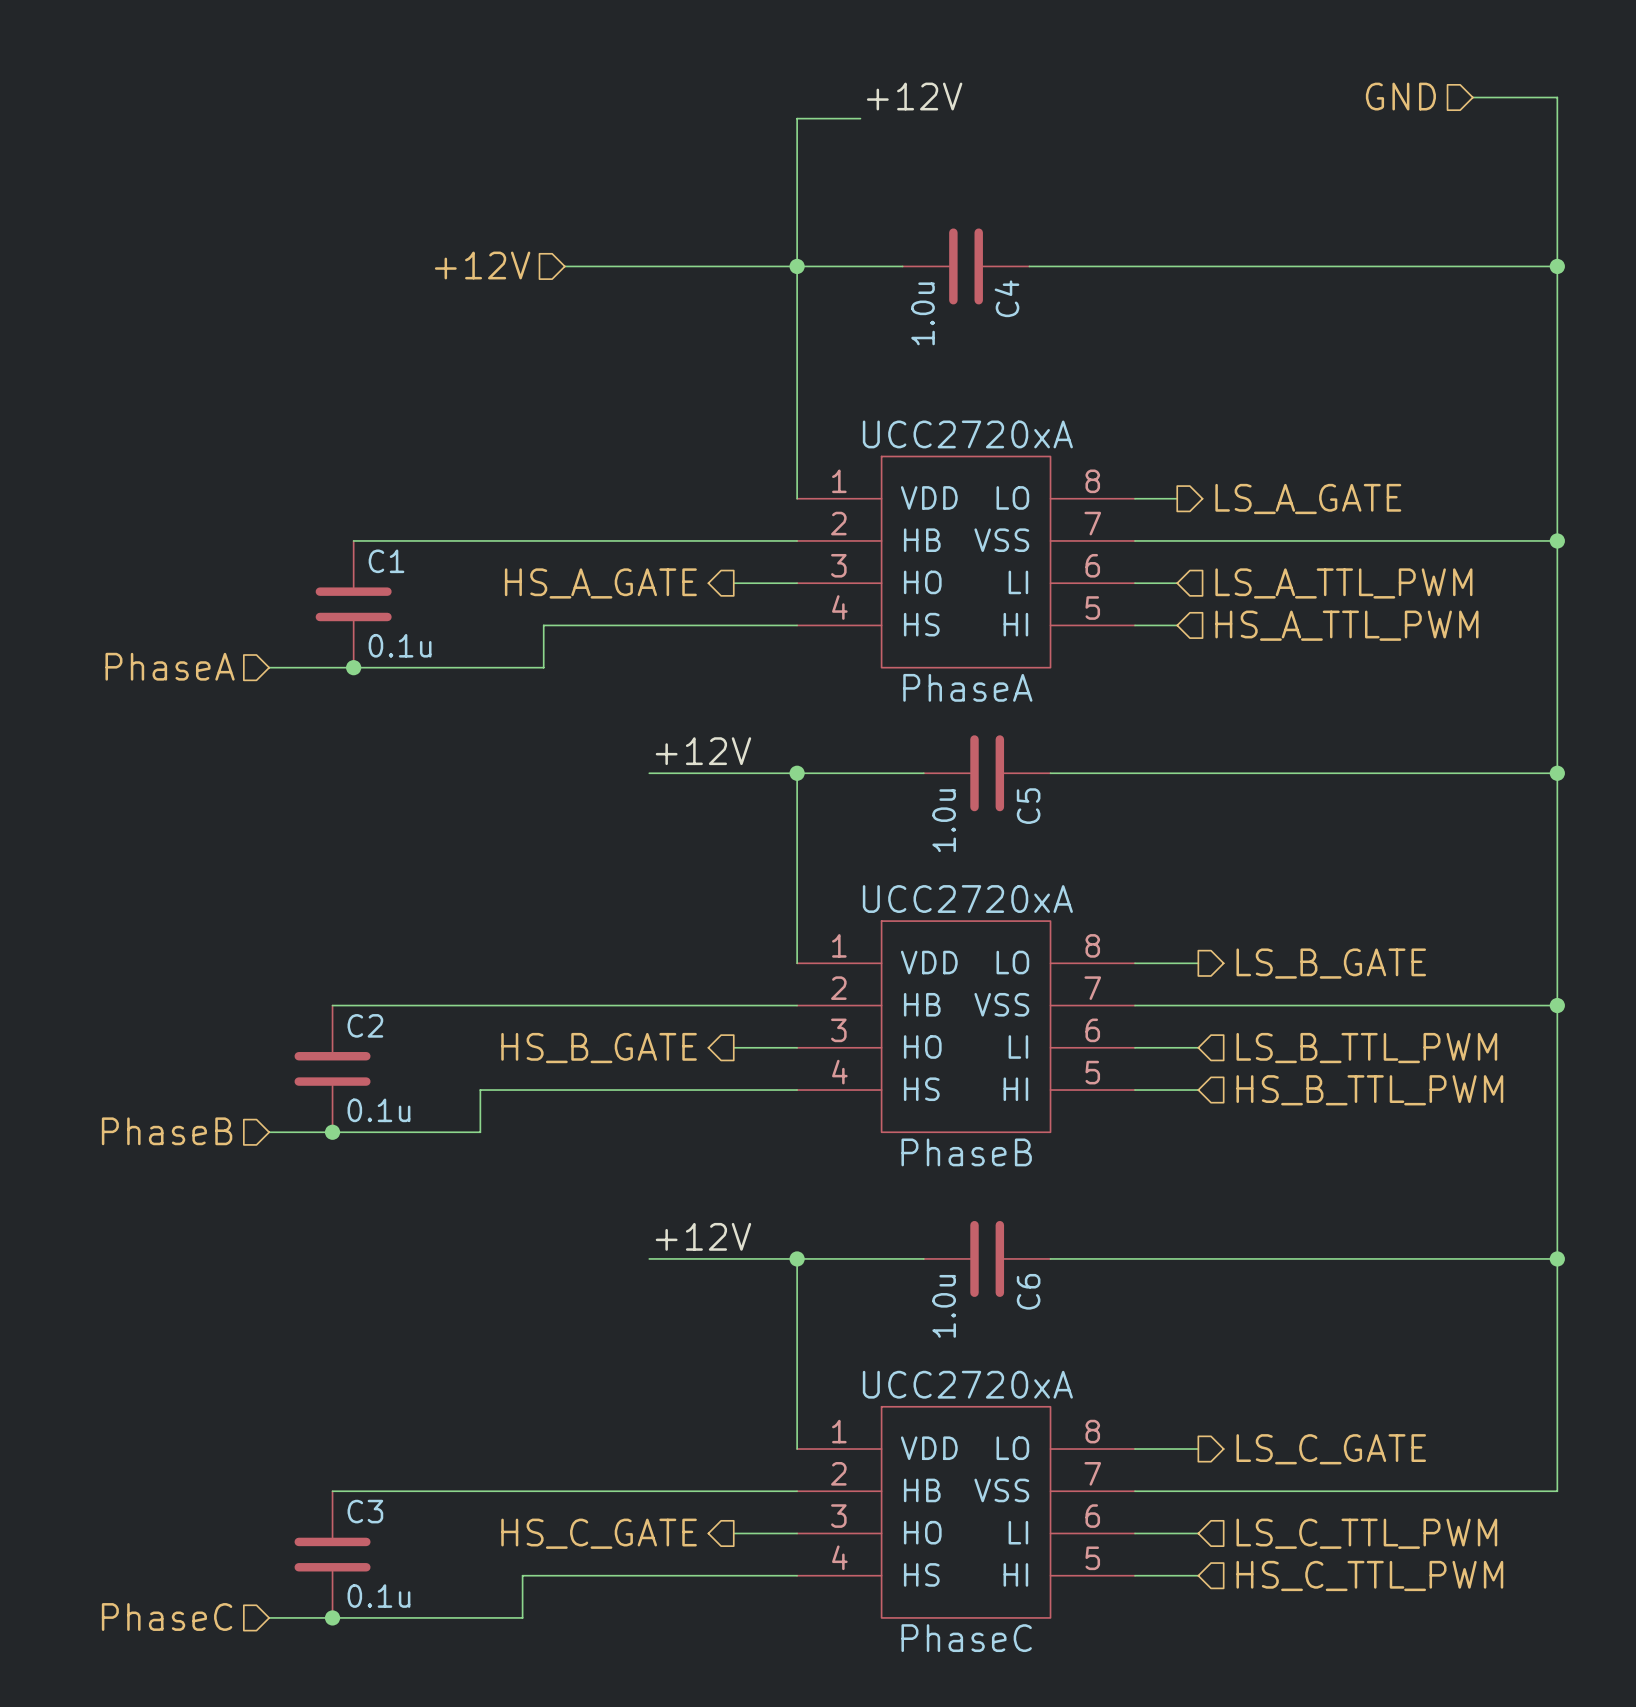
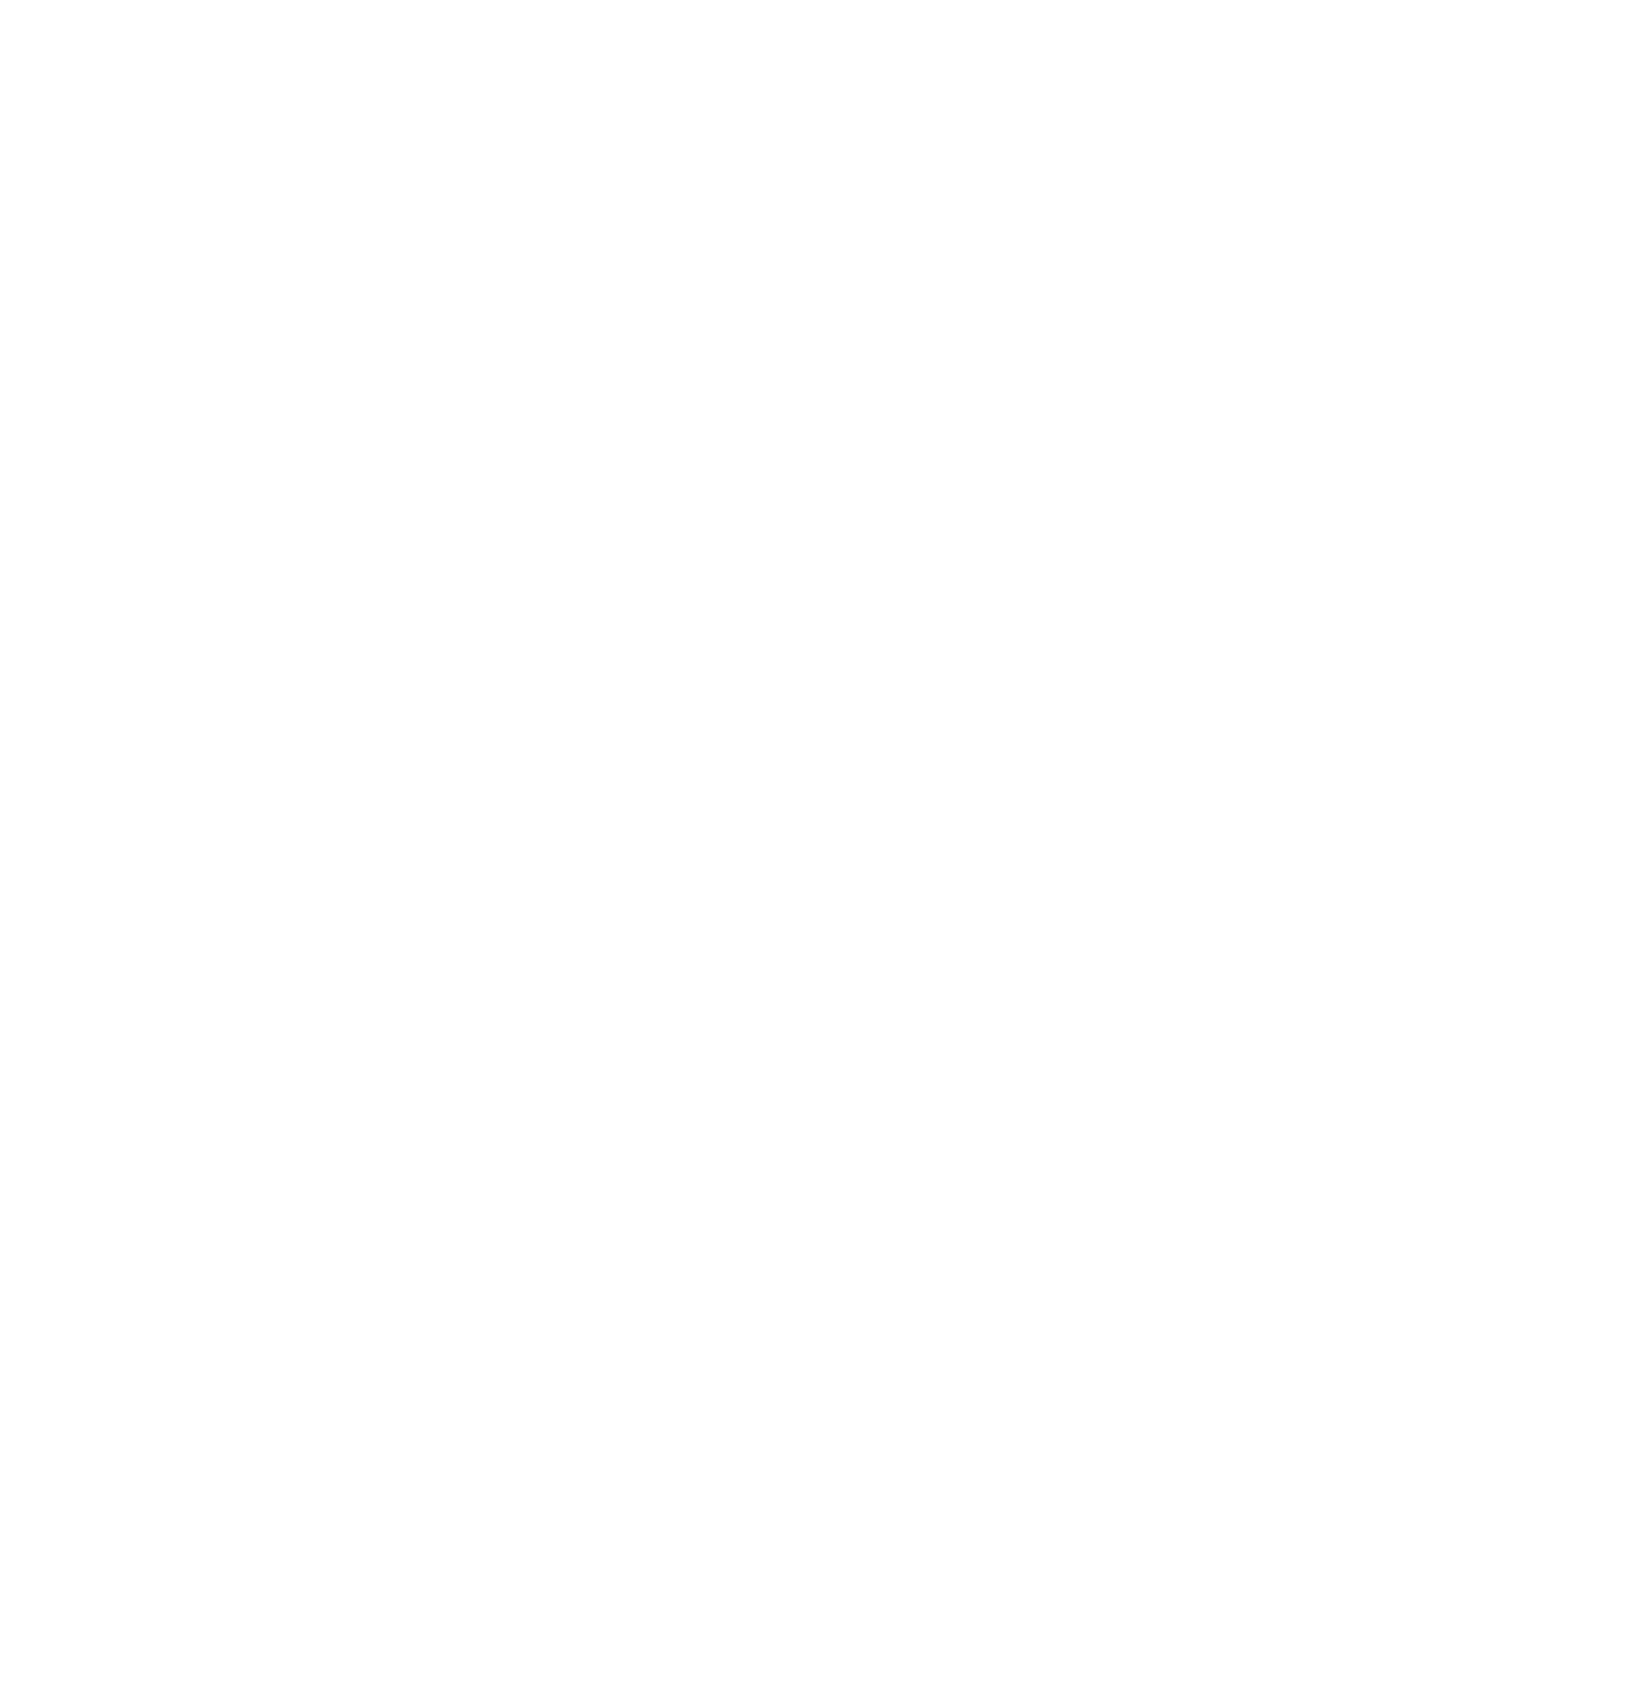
label: +12V (914, 96) -> none
hierarchical label: GND (1400, 96) -> none
wire: (1472, 97) (1557, 97) (1557, 1491) (1134, 1491) -> none
wire: (860, 118) (797, 118) (797, 498) -> none
hierarchical label: +12V (482, 265) -> none
wire: (564, 266) (902, 266) -> none
junction: (797, 266) -> none
C4: 1.0u (966, 266) -> none
wire: (1029, 266) (1557, 266) -> none
junction: (1557, 266) -> none
wire: (1134, 498) (1177, 498) -> none
hierarchical label: LS_A_GATE (1308, 498) -> none
wire: (353, 540) (797, 540) -> none
wire: (1134, 540) (1557, 540) -> none
junction: (1557, 540) -> none
PhaseA: UCC2720xA (966, 562) -> none
hierarchical label: HS_A_GATE (600, 583) -> none
wire: (733, 583) (797, 583) -> none
wire: (1134, 583) (1177, 583) -> none
hierarchical label: LS_A_TTL_PWM (1343, 583) -> none
C1: 0.1u (353, 604) -> none
wire: (797, 625) (543, 625) (543, 667) (269, 667) -> none
wire: (1134, 625) (1177, 625) -> none
hierarchical label: HS_A_TTL_PWM (1346, 625) -> none
hierarchical label: PhaseA (170, 666) -> none
junction: (353, 667) -> none
label: +12V (703, 751) -> none
wire: (649, 773) (923, 773) -> none
wire: (797, 773) (797, 963) -> none
junction: (797, 773) -> none
C5: 1.0u (987, 773) -> none
wire: (1050, 773) (1557, 773) -> none
junction: (1557, 773) -> none
wire: (1134, 963) (1198, 963) -> none
hierarchical label: LS_B_GATE (1331, 963) -> none
wire: (332, 1005) (797, 1005) -> none
wire: (1134, 1005) (1557, 1005) -> none
junction: (1557, 1005) -> none
PhaseB: UCC2720xA (966, 1026) -> none
wire: (733, 1047) (797, 1047) -> none
wire: (1134, 1047) (1198, 1047) -> none
hierarchical label: HS_B_GATE (599, 1048) -> none
hierarchical label: LS_B_TTL_PWM (1366, 1048) -> none
C2: 0.1u (332, 1068) -> none
wire: (797, 1090) (480, 1090) (480, 1132) (269, 1132) -> none
wire: (1134, 1090) (1198, 1090) -> none
hierarchical label: HS_B_TTL_PWM (1369, 1090) -> none
hierarchical label: PhaseB (167, 1131) -> none
junction: (332, 1132) -> none
label: +12V (703, 1236) -> none
wire: (649, 1258) (923, 1258) -> none
wire: (797, 1258) (797, 1449) -> none
junction: (797, 1258) -> none
C6: 1.0u (987, 1258) -> none
wire: (1050, 1258) (1557, 1258) -> none
junction: (1557, 1258) -> none
wire: (1134, 1449) (1198, 1449) -> none
hierarchical label: LS_C_GATE (1331, 1449) -> none
wire: (332, 1491) (797, 1491) -> none
PhaseC: UCC2720xA (966, 1512) -> none
hierarchical label: HS_C_GATE (599, 1533) -> none
wire: (733, 1533) (797, 1533) -> none
wire: (1134, 1533) (1198, 1533) -> none
hierarchical label: LS_C_TTL_PWM (1366, 1533) -> none
C3: 0.1u (332, 1554) -> none
wire: (797, 1575) (522, 1575) (522, 1617) (269, 1617) -> none
wire: (1134, 1575) (1198, 1575) -> none
hierarchical label: HS_C_TTL_PWM (1369, 1575) -> none
hierarchical label: PhaseC (167, 1617) -> none
junction: (332, 1617) -> none

